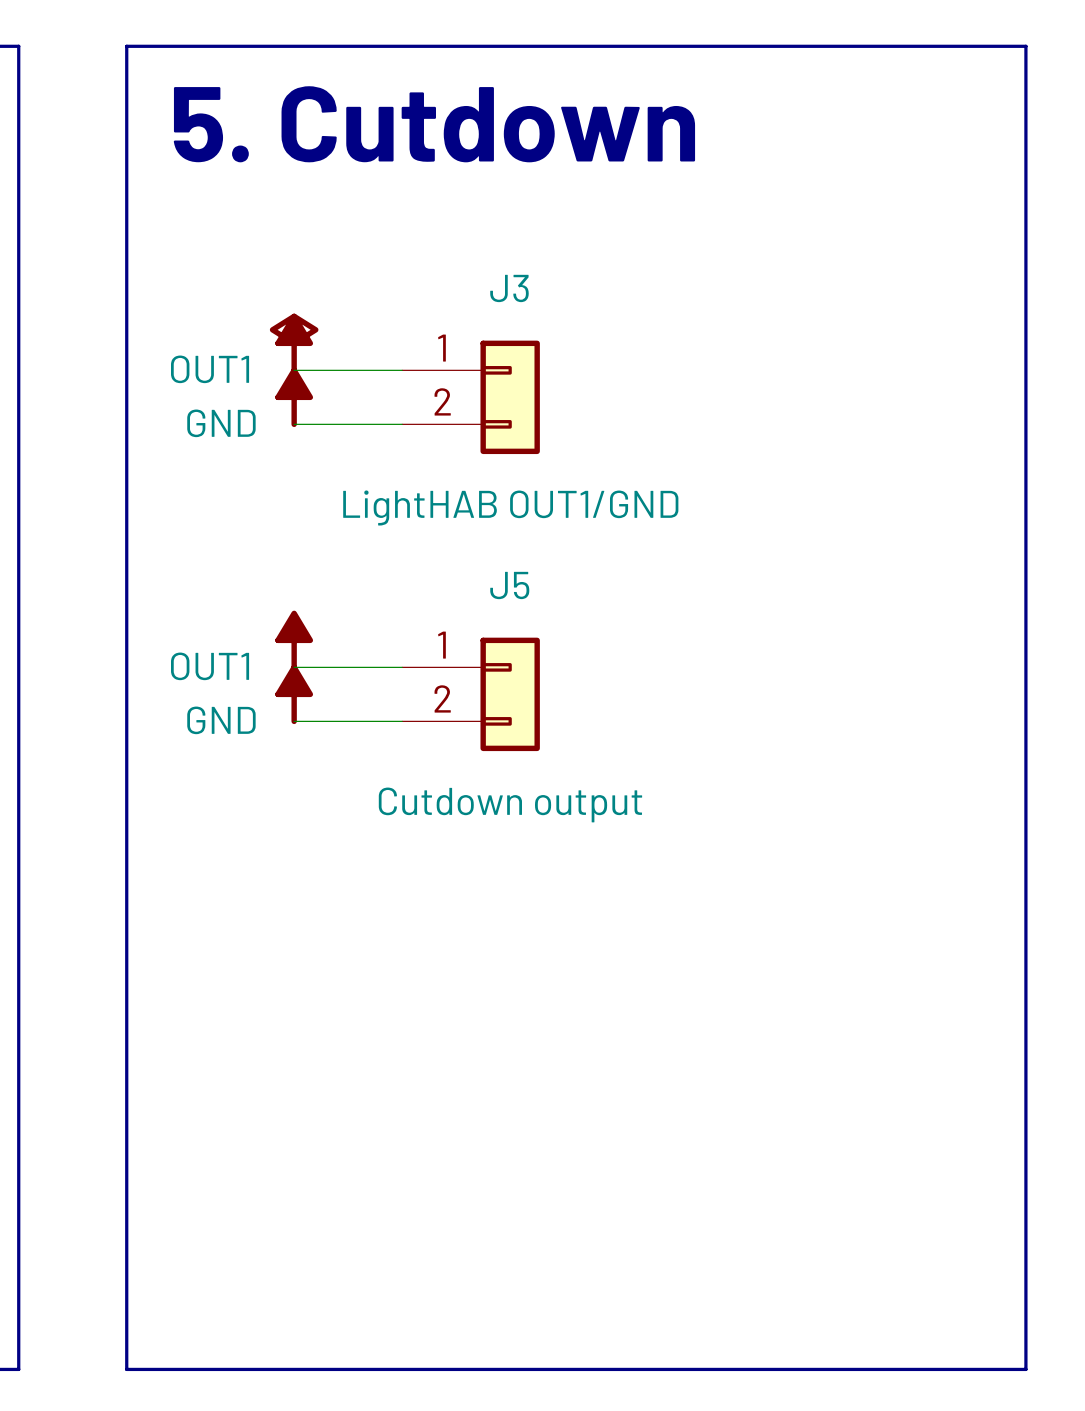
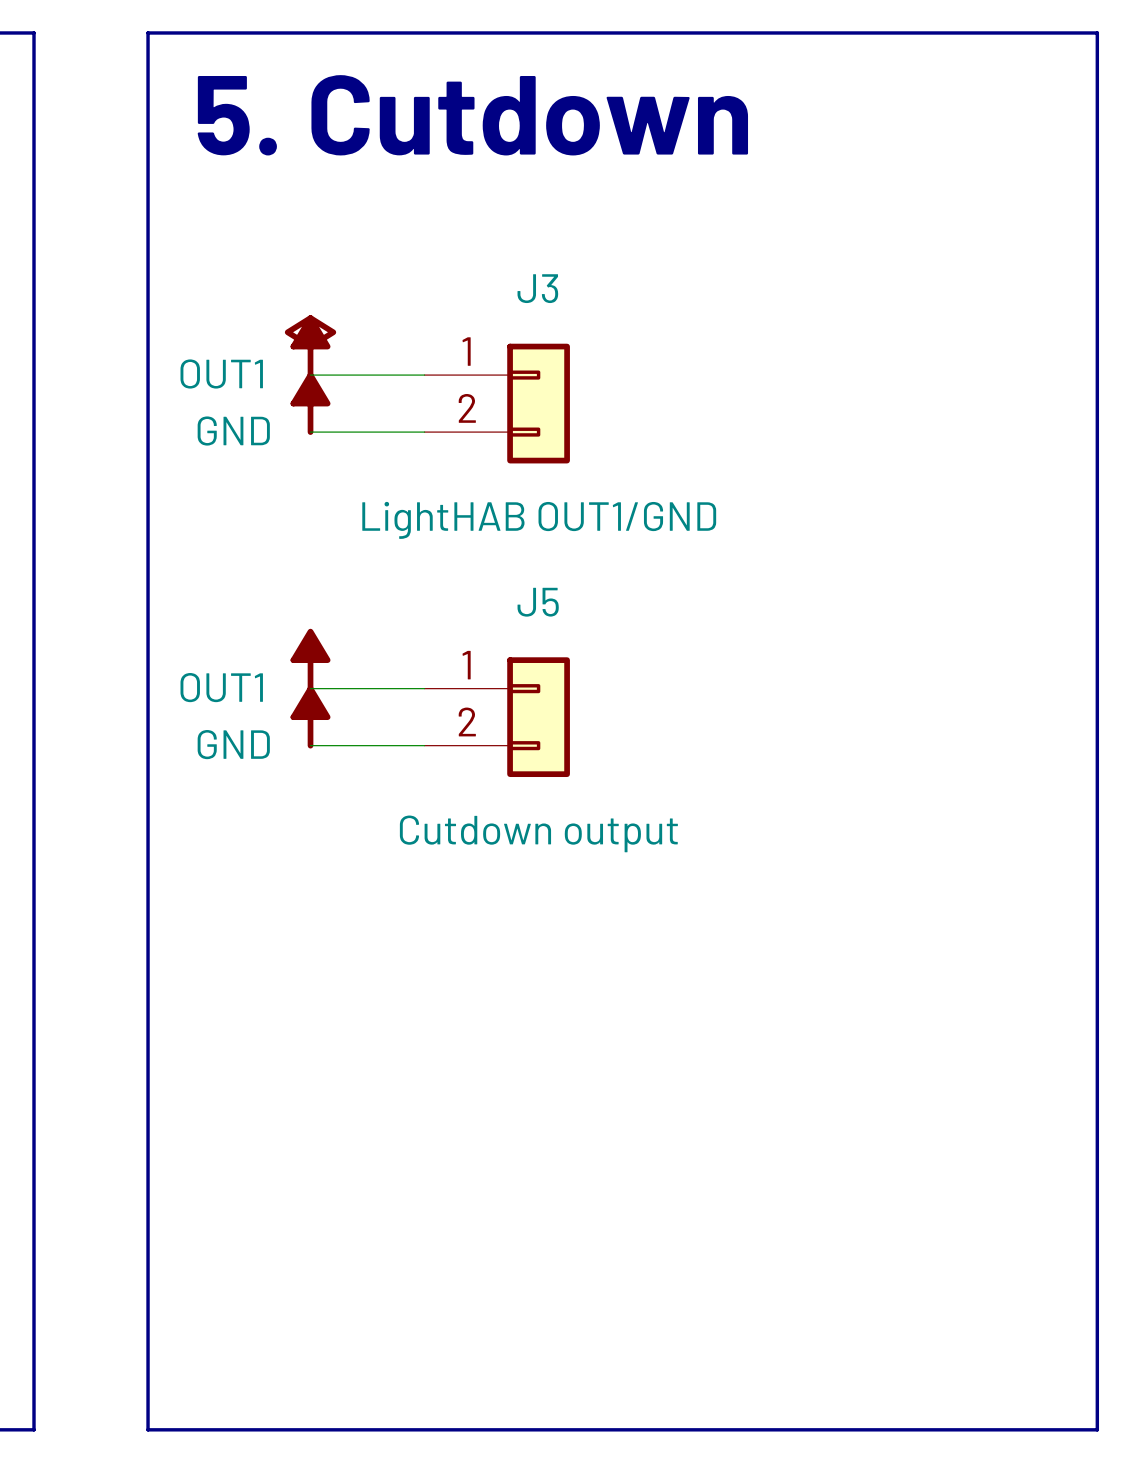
line: (18, 46) (18, 1369) -> (19, 32) (34, 32) (34, 1429) (19, 1429)
line: (140, 46) (126, 46) (126, 1369) (140, 1369) -> (148, 32) (148, 1429)
line: (1025, 46) (1025, 1369) -> (1083, 32) (1097, 32) (1097, 1429) (1083, 1429)
text position: 5. Cutdown (434, 124) -> 5. Cutdown (472, 115)

